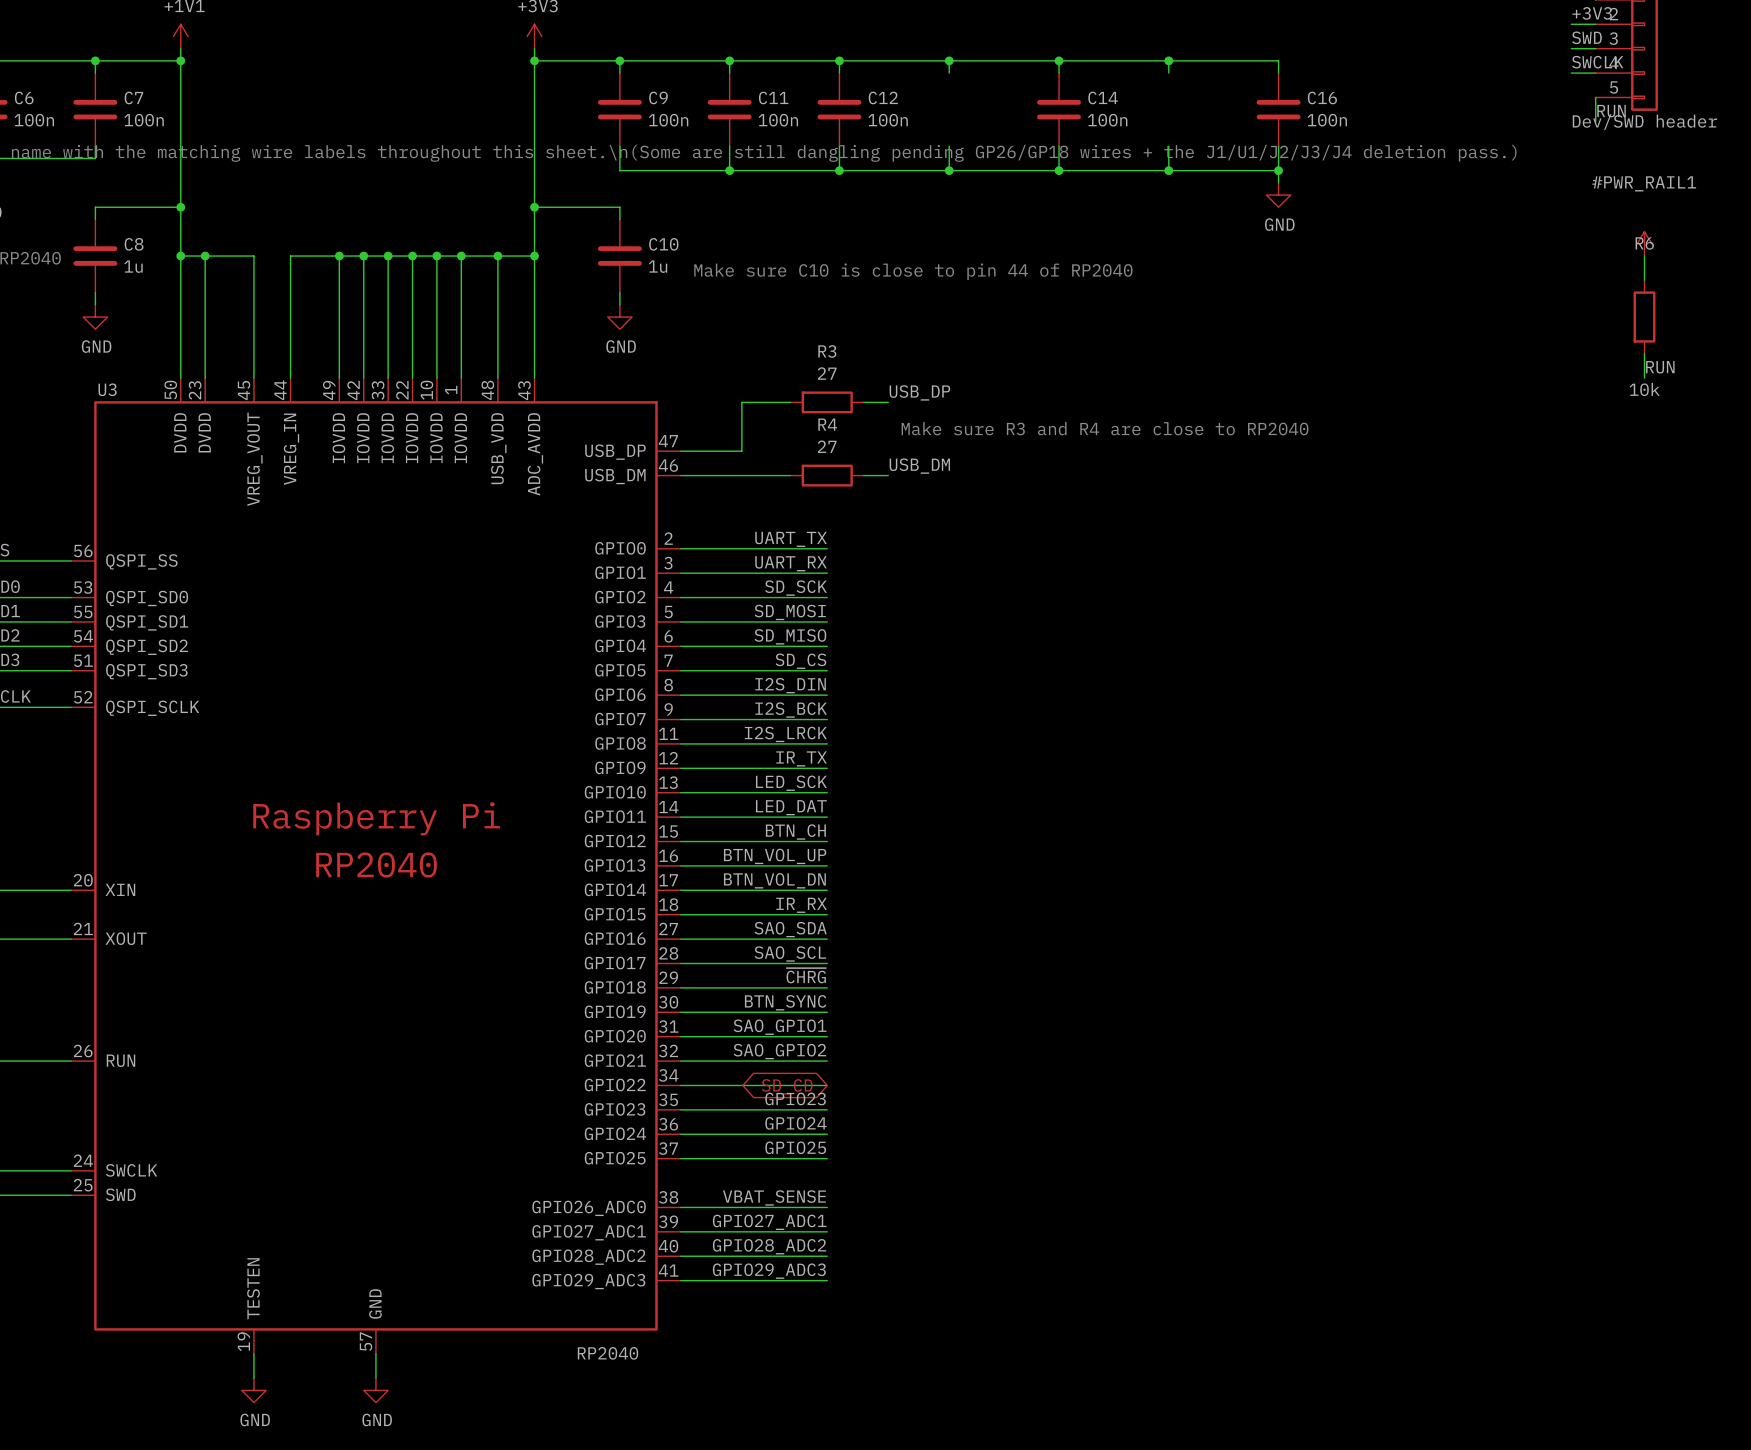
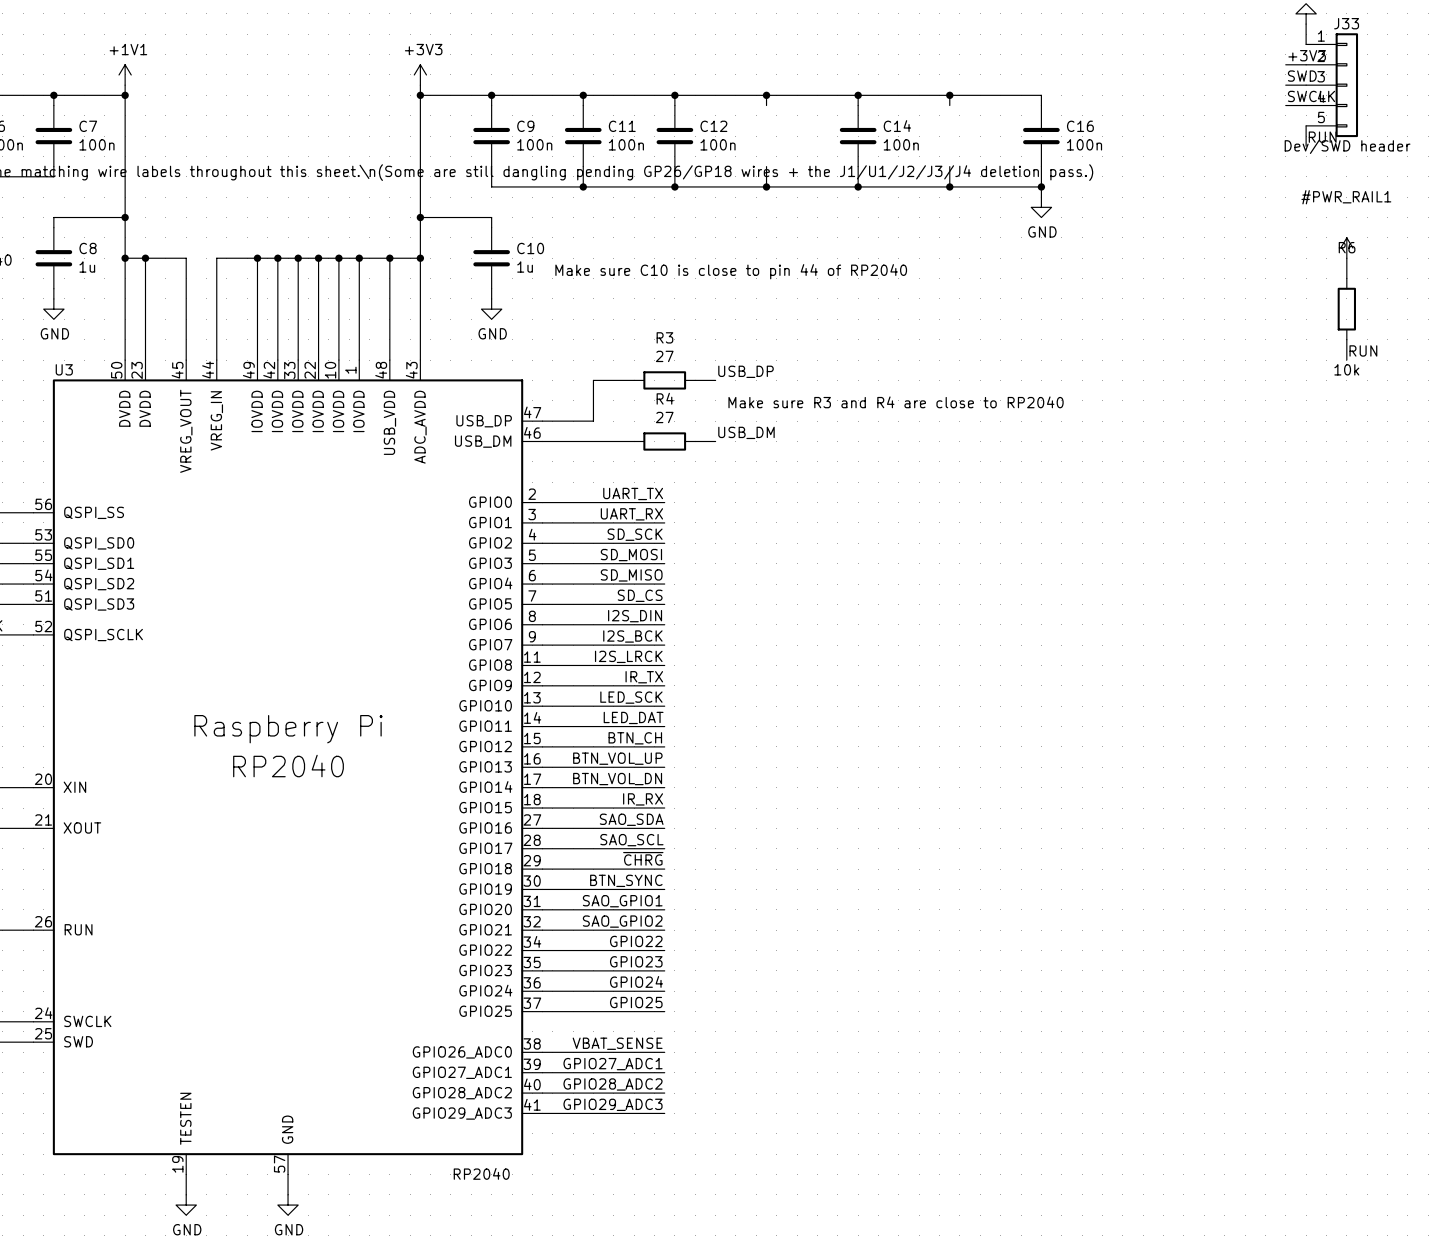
label: none -> GPIO22 (636, 941)
global label: SD_CD (787, 1086) -> none

